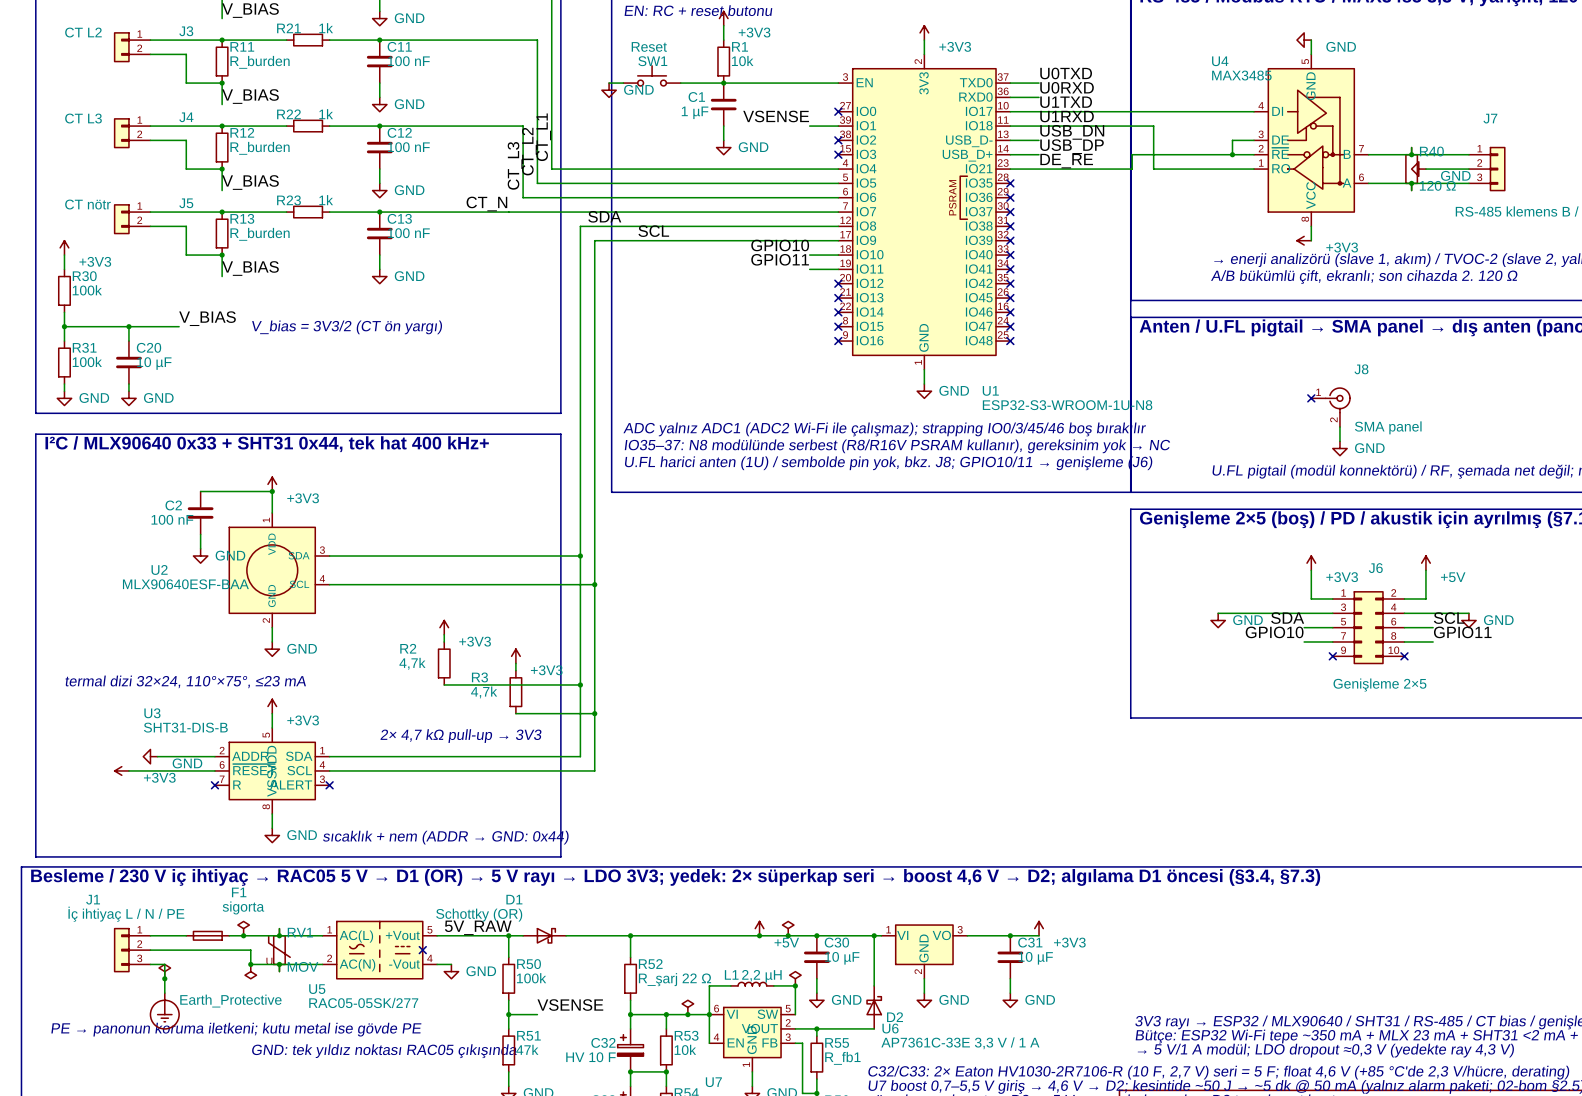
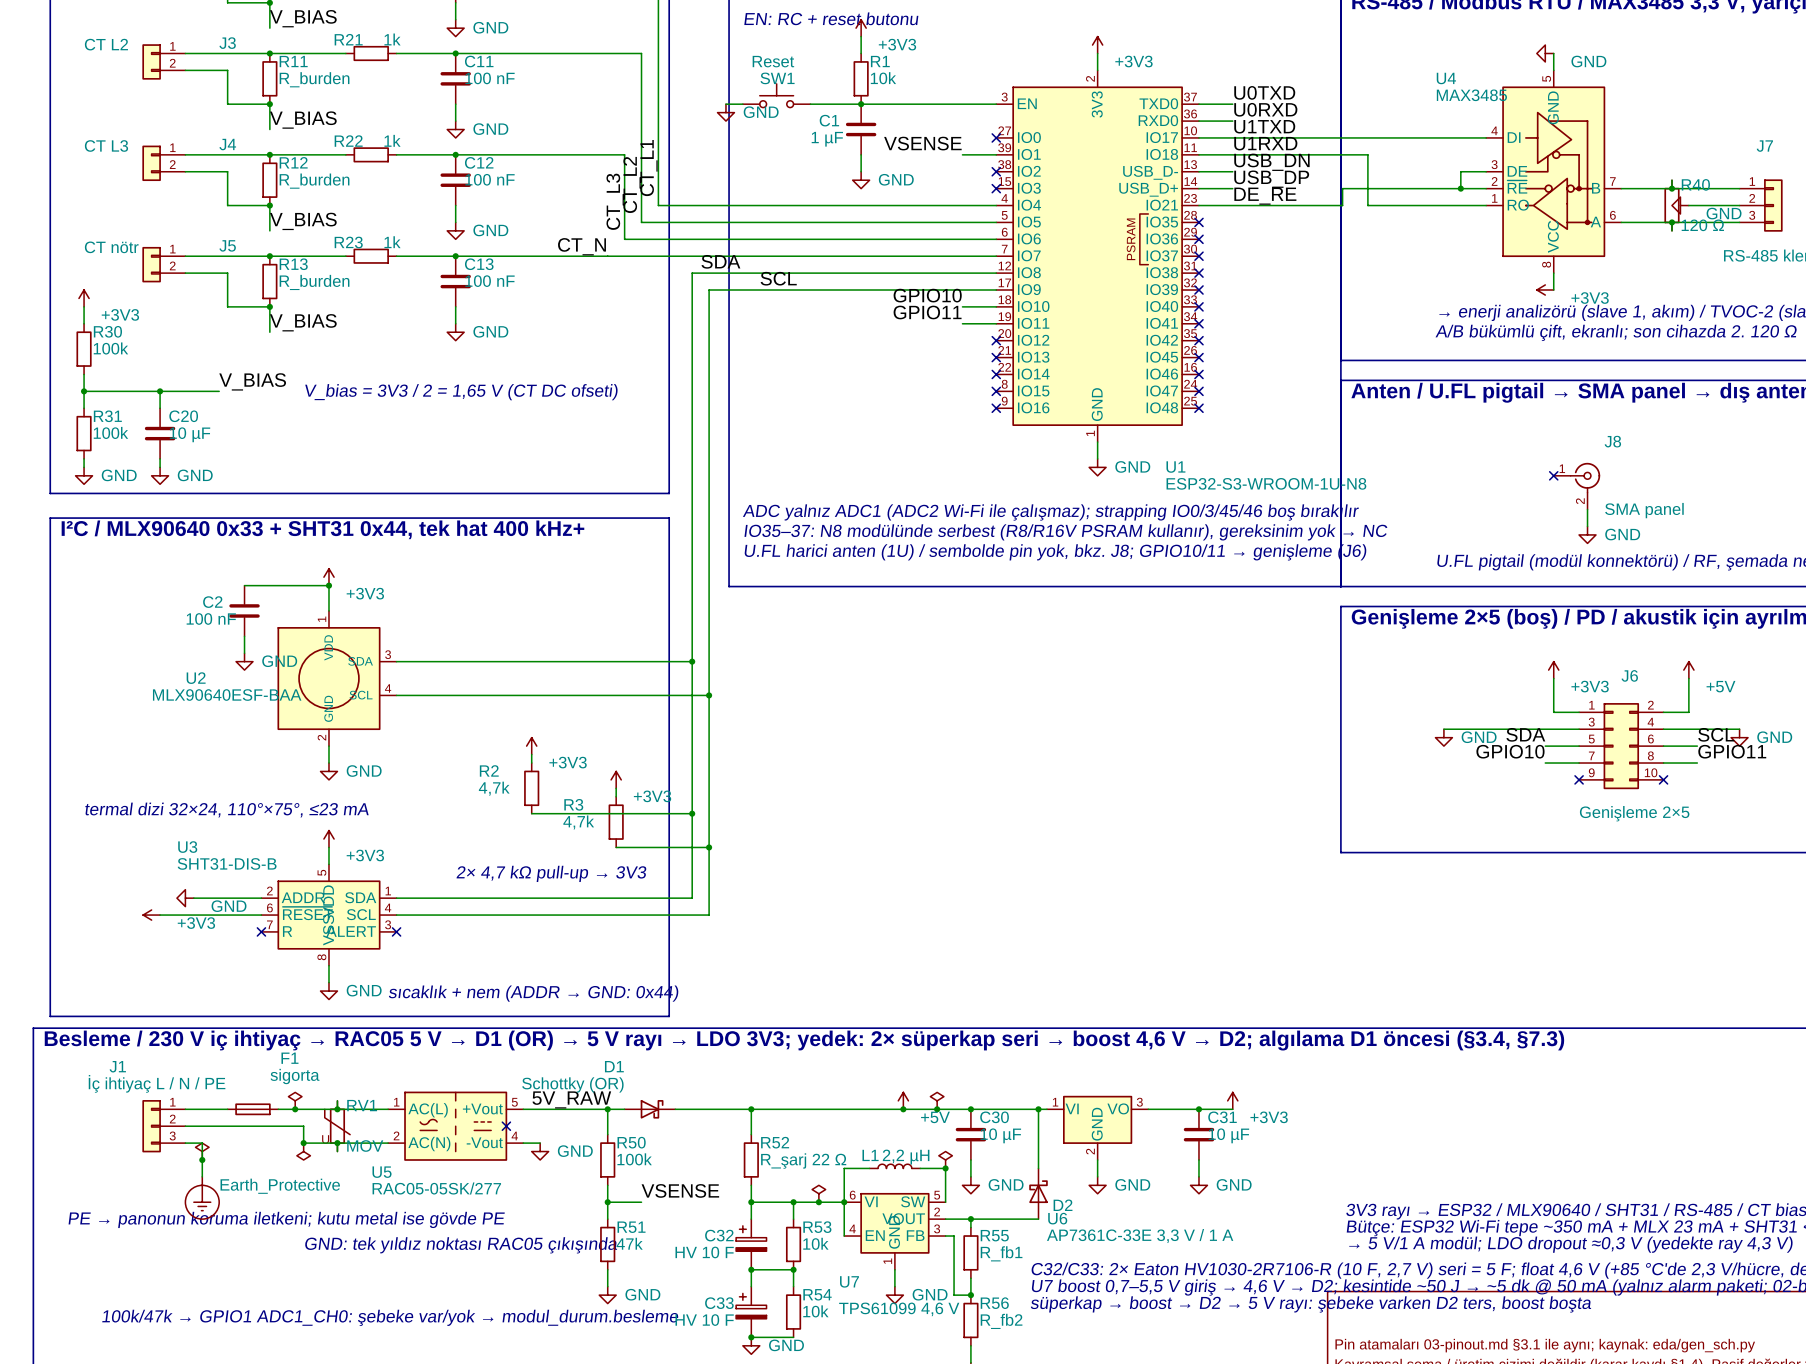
text: V_bias = 3V3/2 (CT ön yargı) (347, 327) -> V_bias = 3V3 / 2 = 1,65 V (CT DC ofseti) (461, 392)

